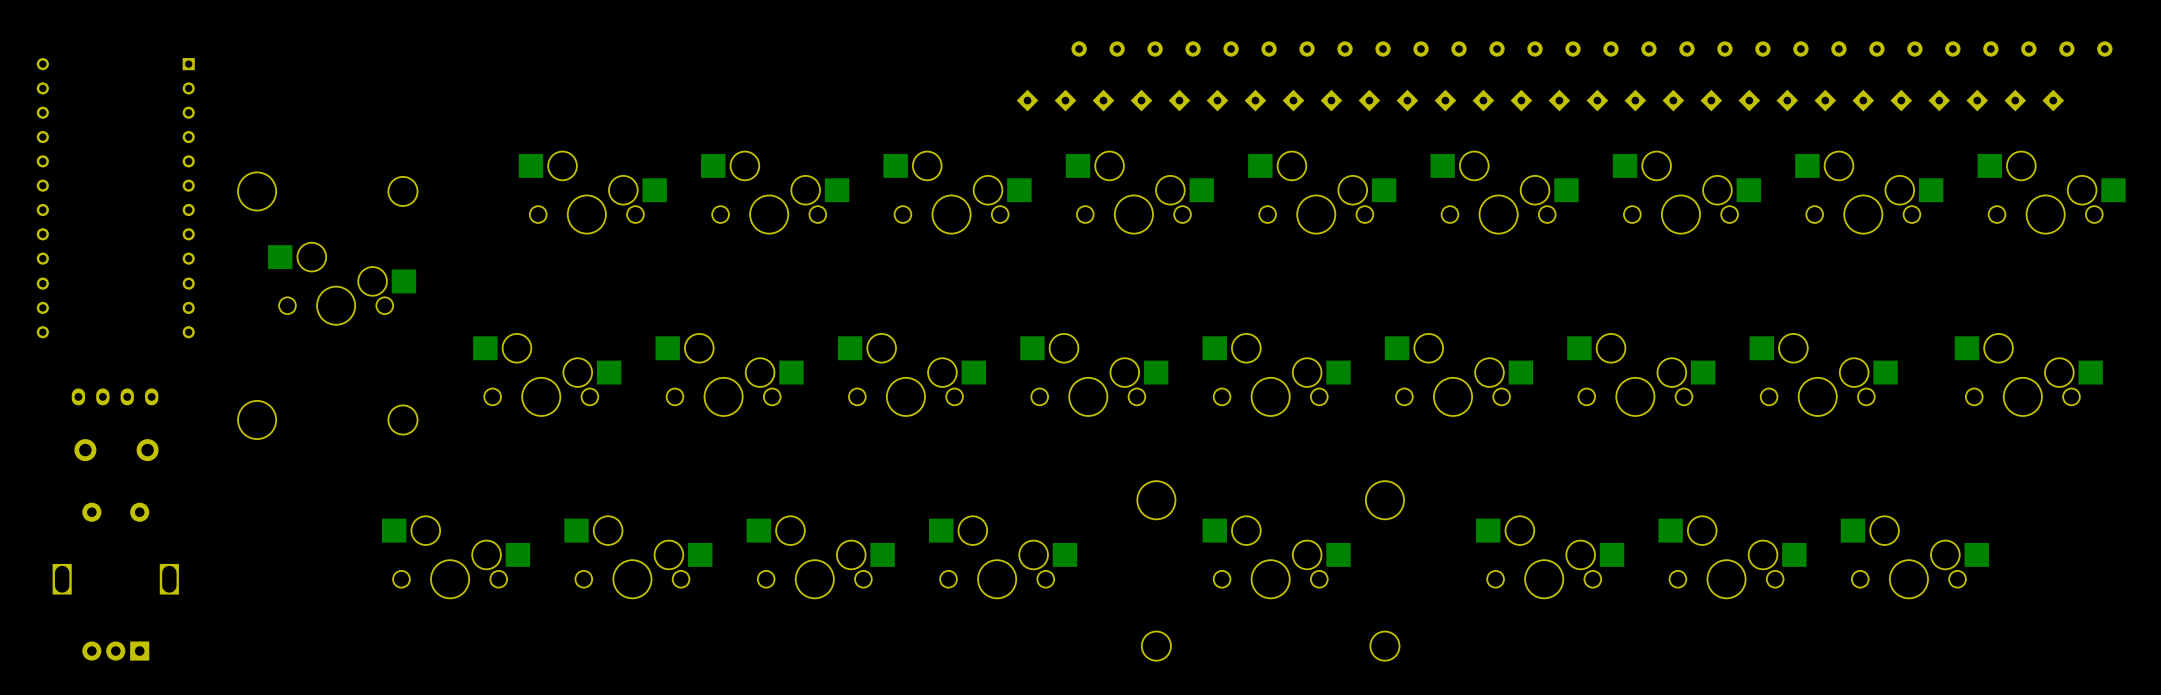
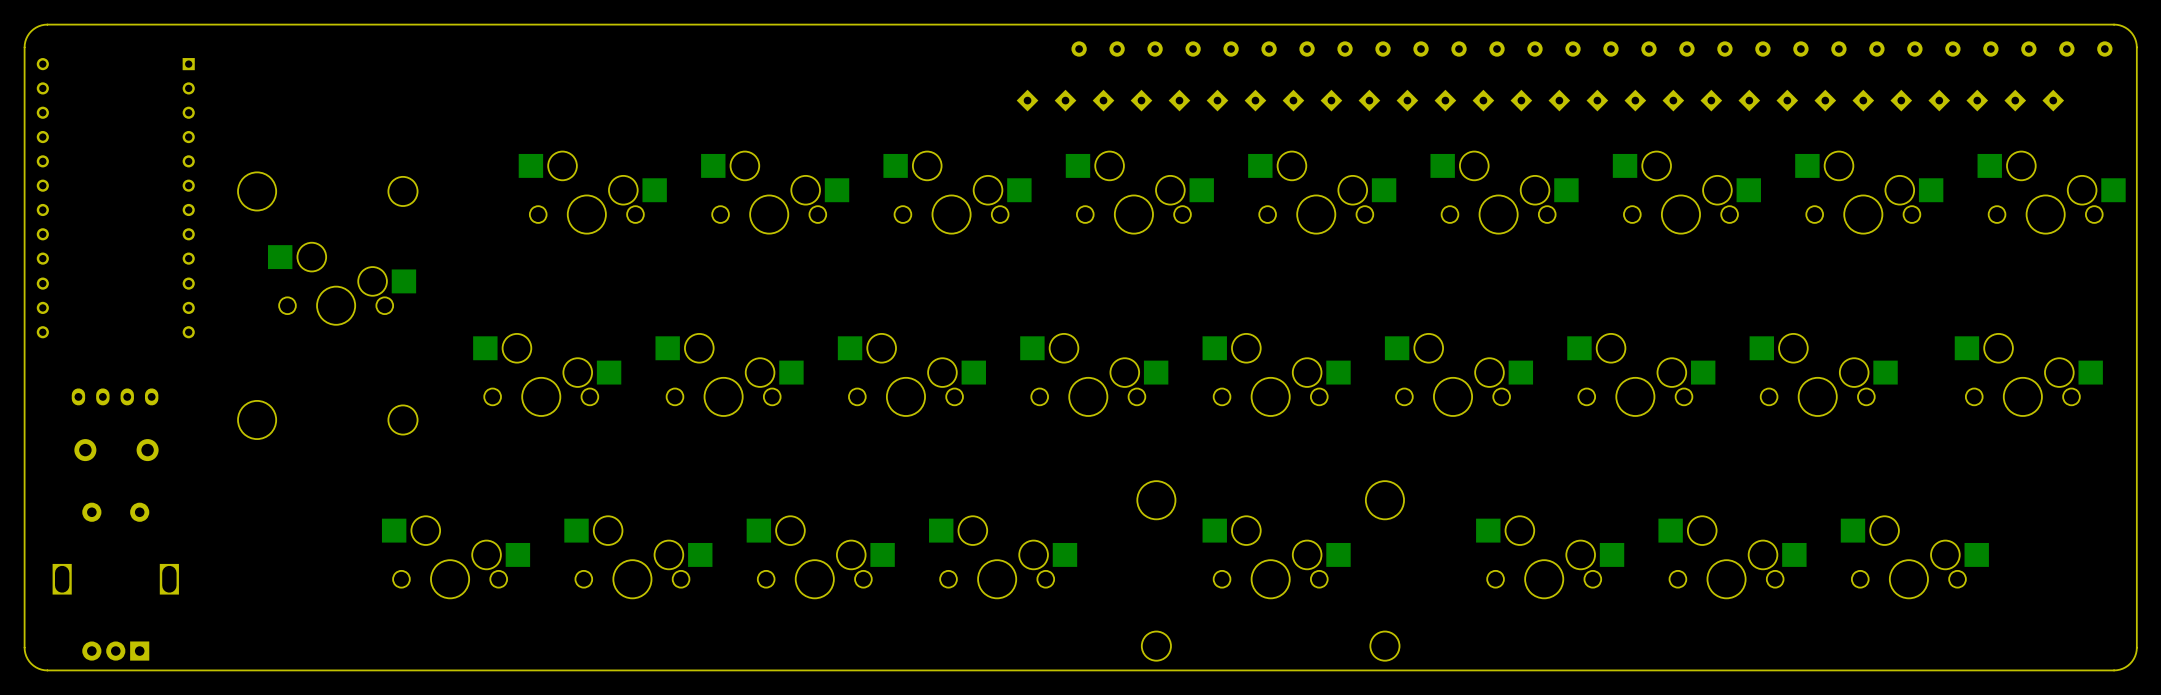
board edge: none -> (2114, 24) (41, 25) (29, 33) (24, 47) (25, 653) (33, 665) (47, 670) (2119, 669) (2132, 661) (2136, 647) (2136, 47) (2135, 38) (2130, 31) (2122, 26) (2114, 24)

